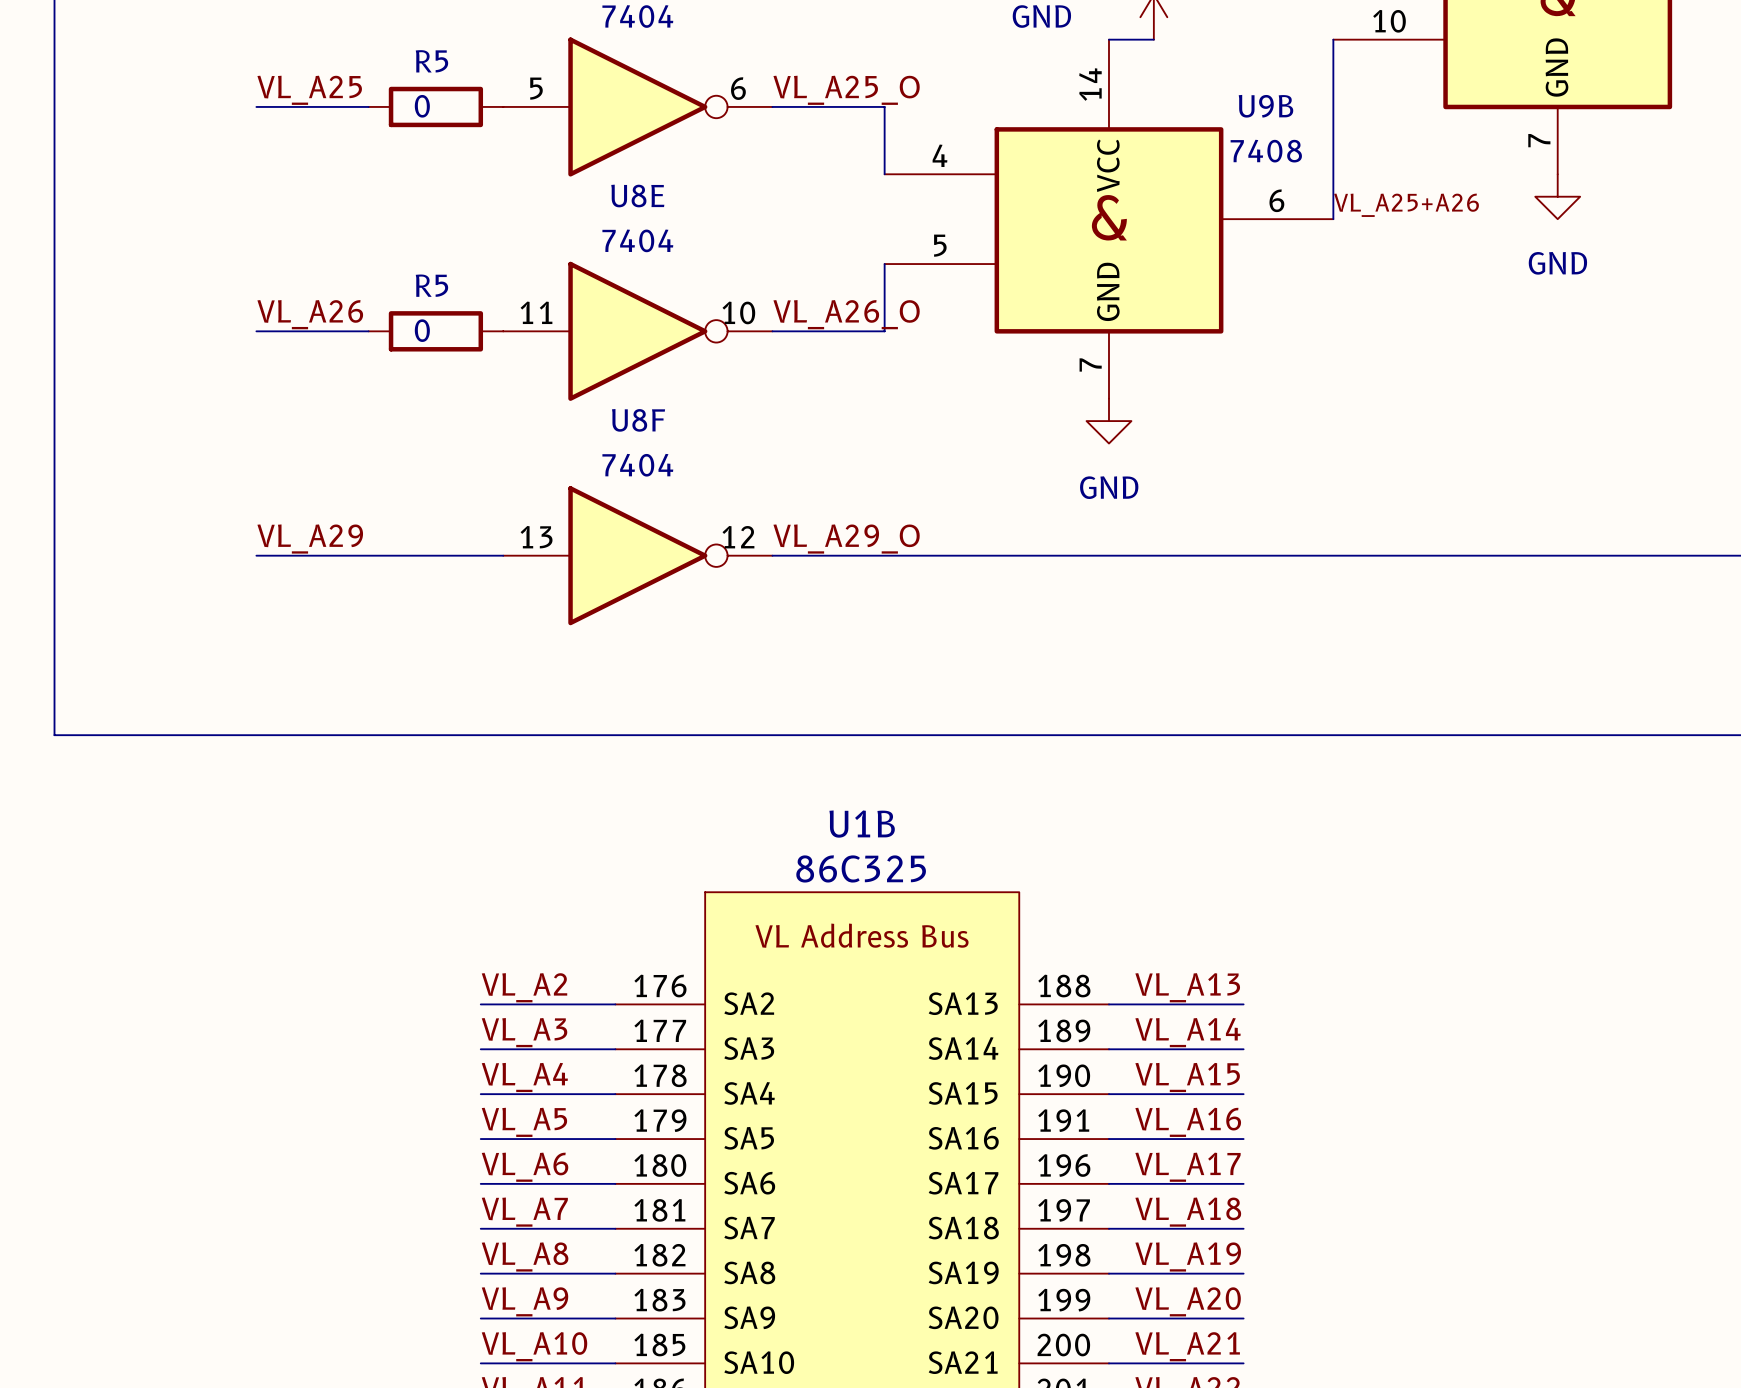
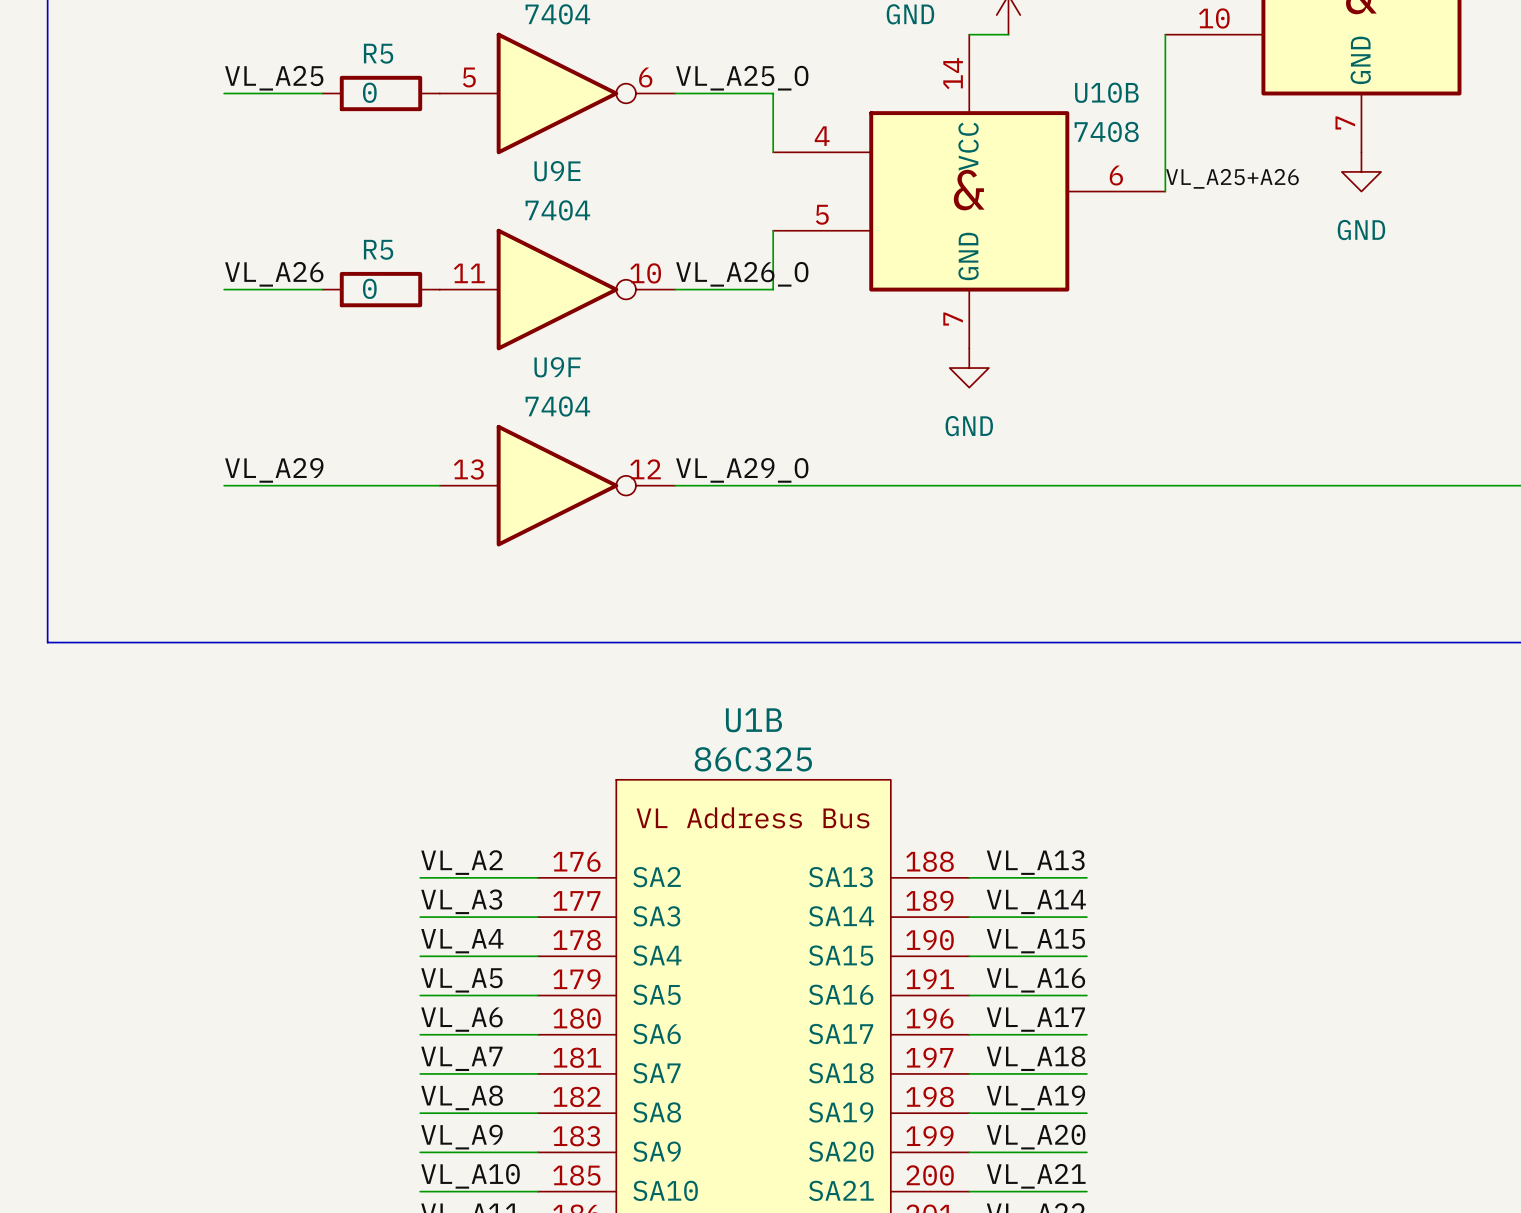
U9B name: U9B (1265, 106) -> U10B (1106, 92)
U8E name: U8E (637, 196) -> U9E (557, 171)
U8F name: U8F (638, 420) -> U9F (557, 367)

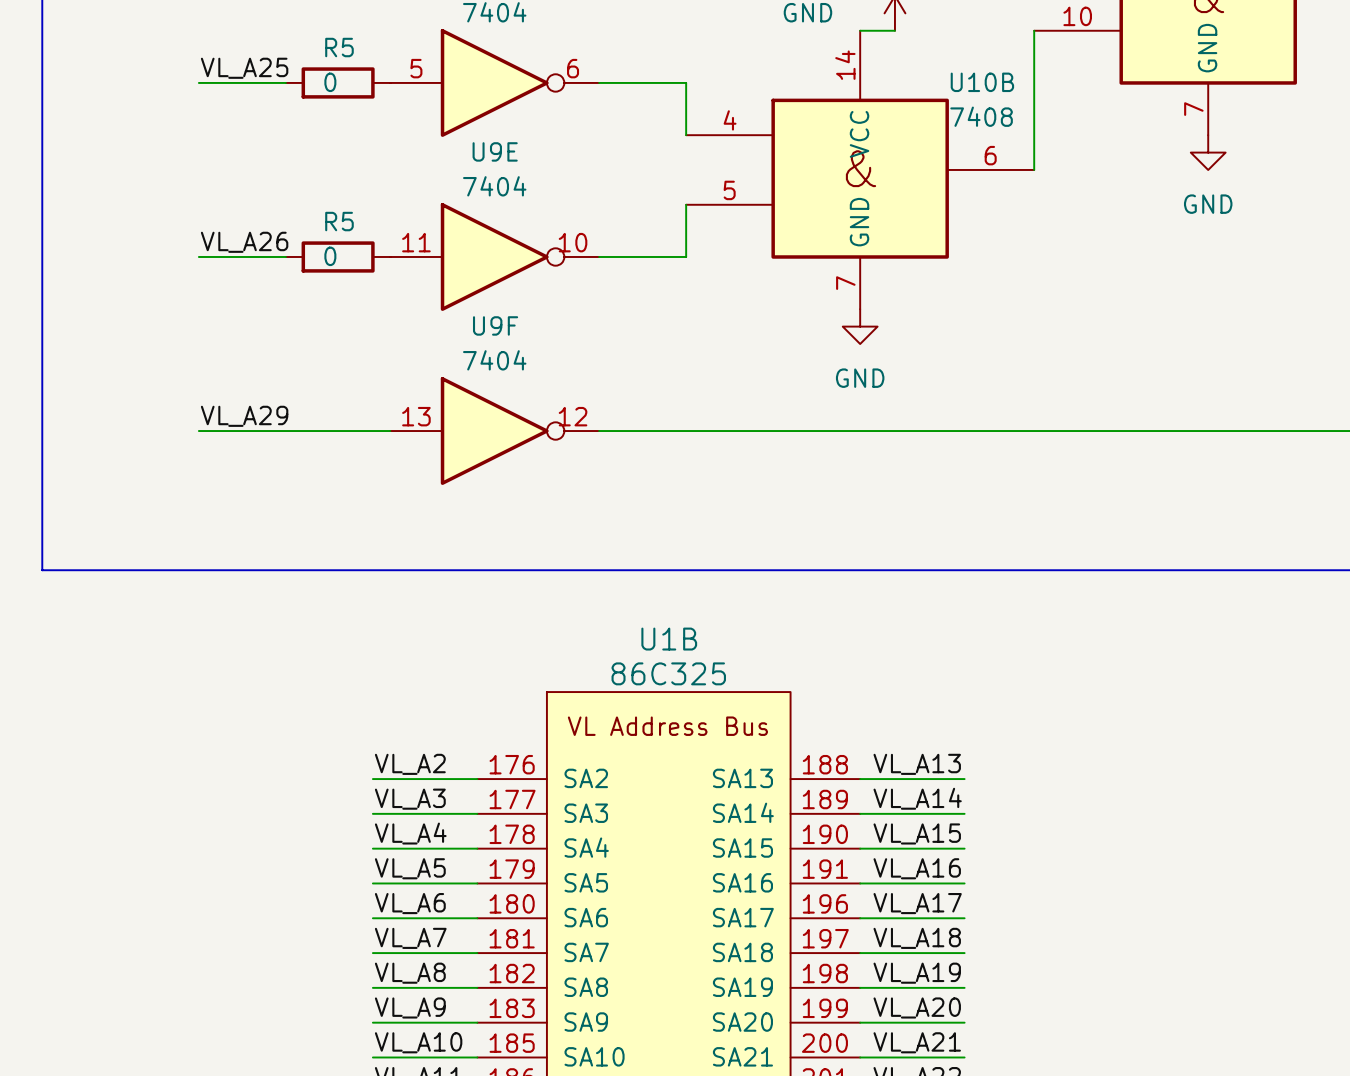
label: VL_A25_O (742, 78) -> none
label: VL_A25+A26 (1232, 178) -> none
label: VL_A26_O (742, 274) -> none
label: VL_A29_O (742, 470) -> none

